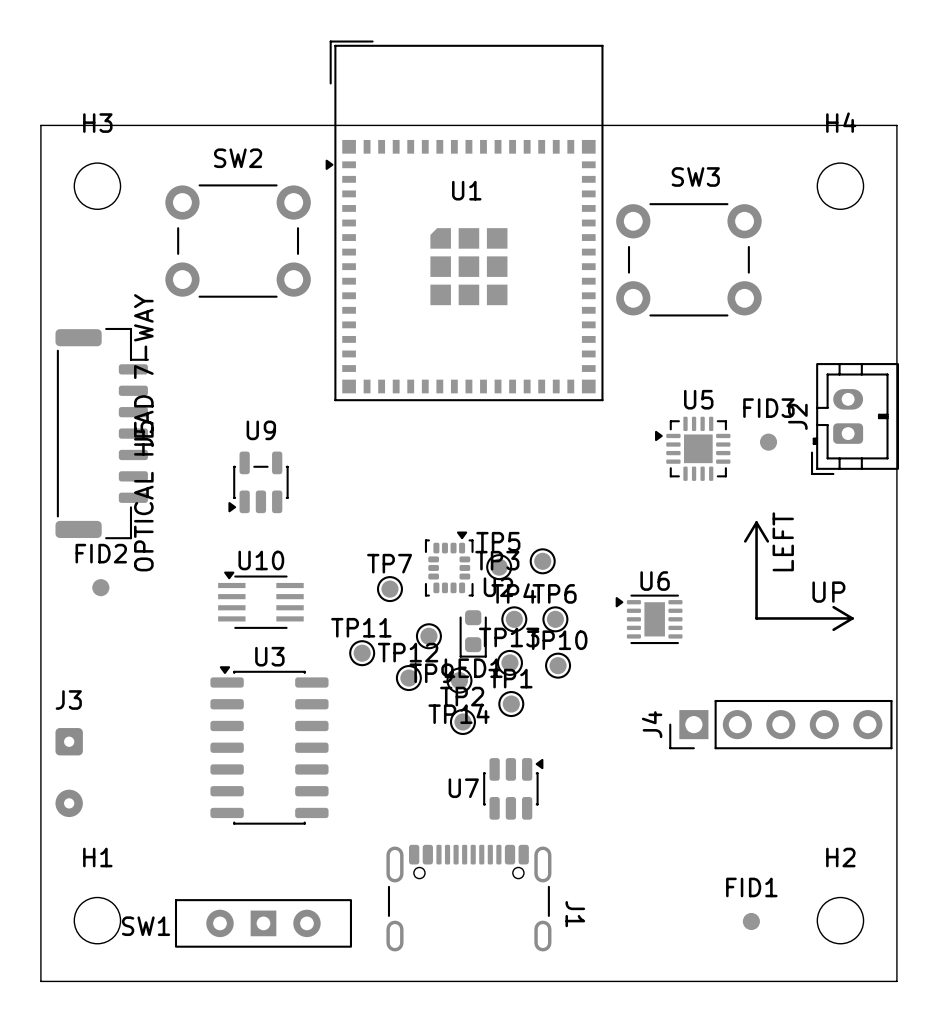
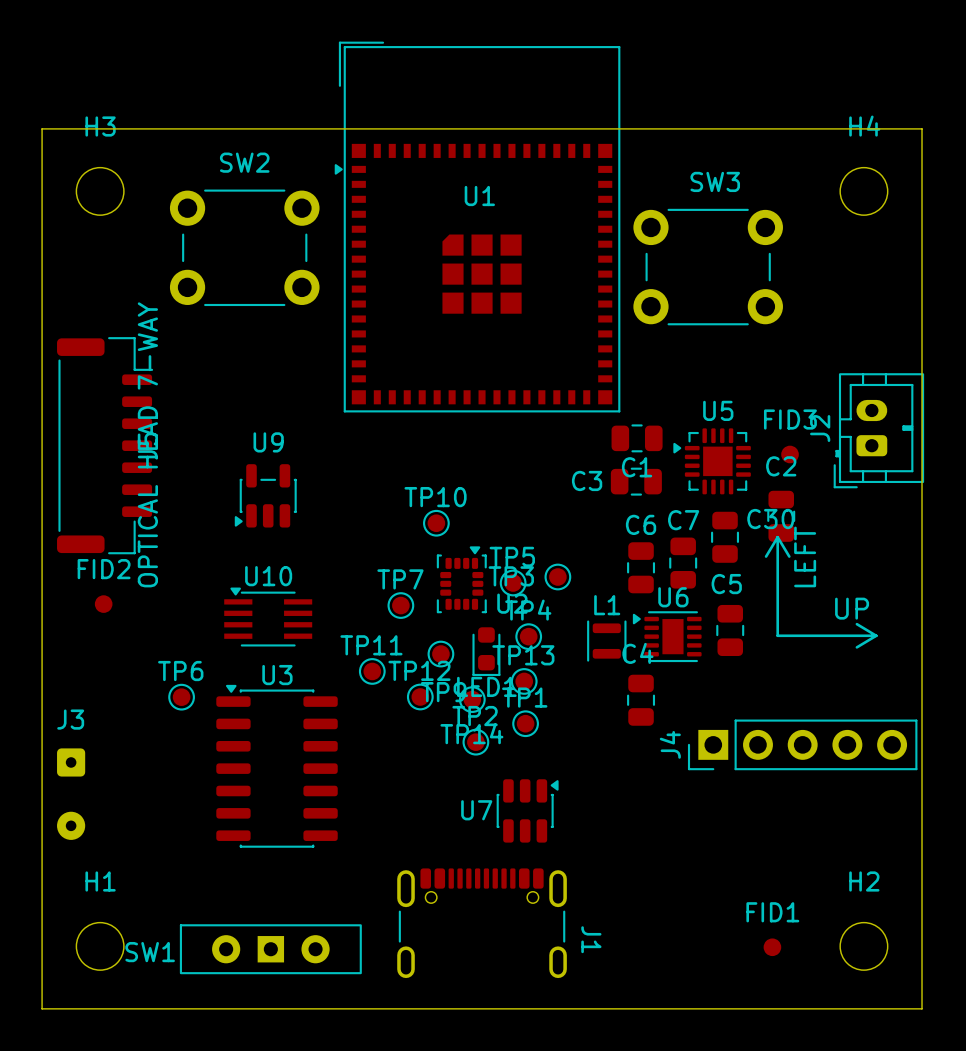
C1: none -> (637, 438)
C3: none -> (636, 481)
C2: none -> (781, 516)
C30: none -> (725, 537)
C7: none -> (683, 563)
C6: none -> (641, 567)
C5: none -> (730, 630)
TP6 position: (555, 619) -> (181, 697)
L1: none -> (606, 641)
TP10 position: (558, 665) -> (436, 523)
C4: none -> (641, 700)

